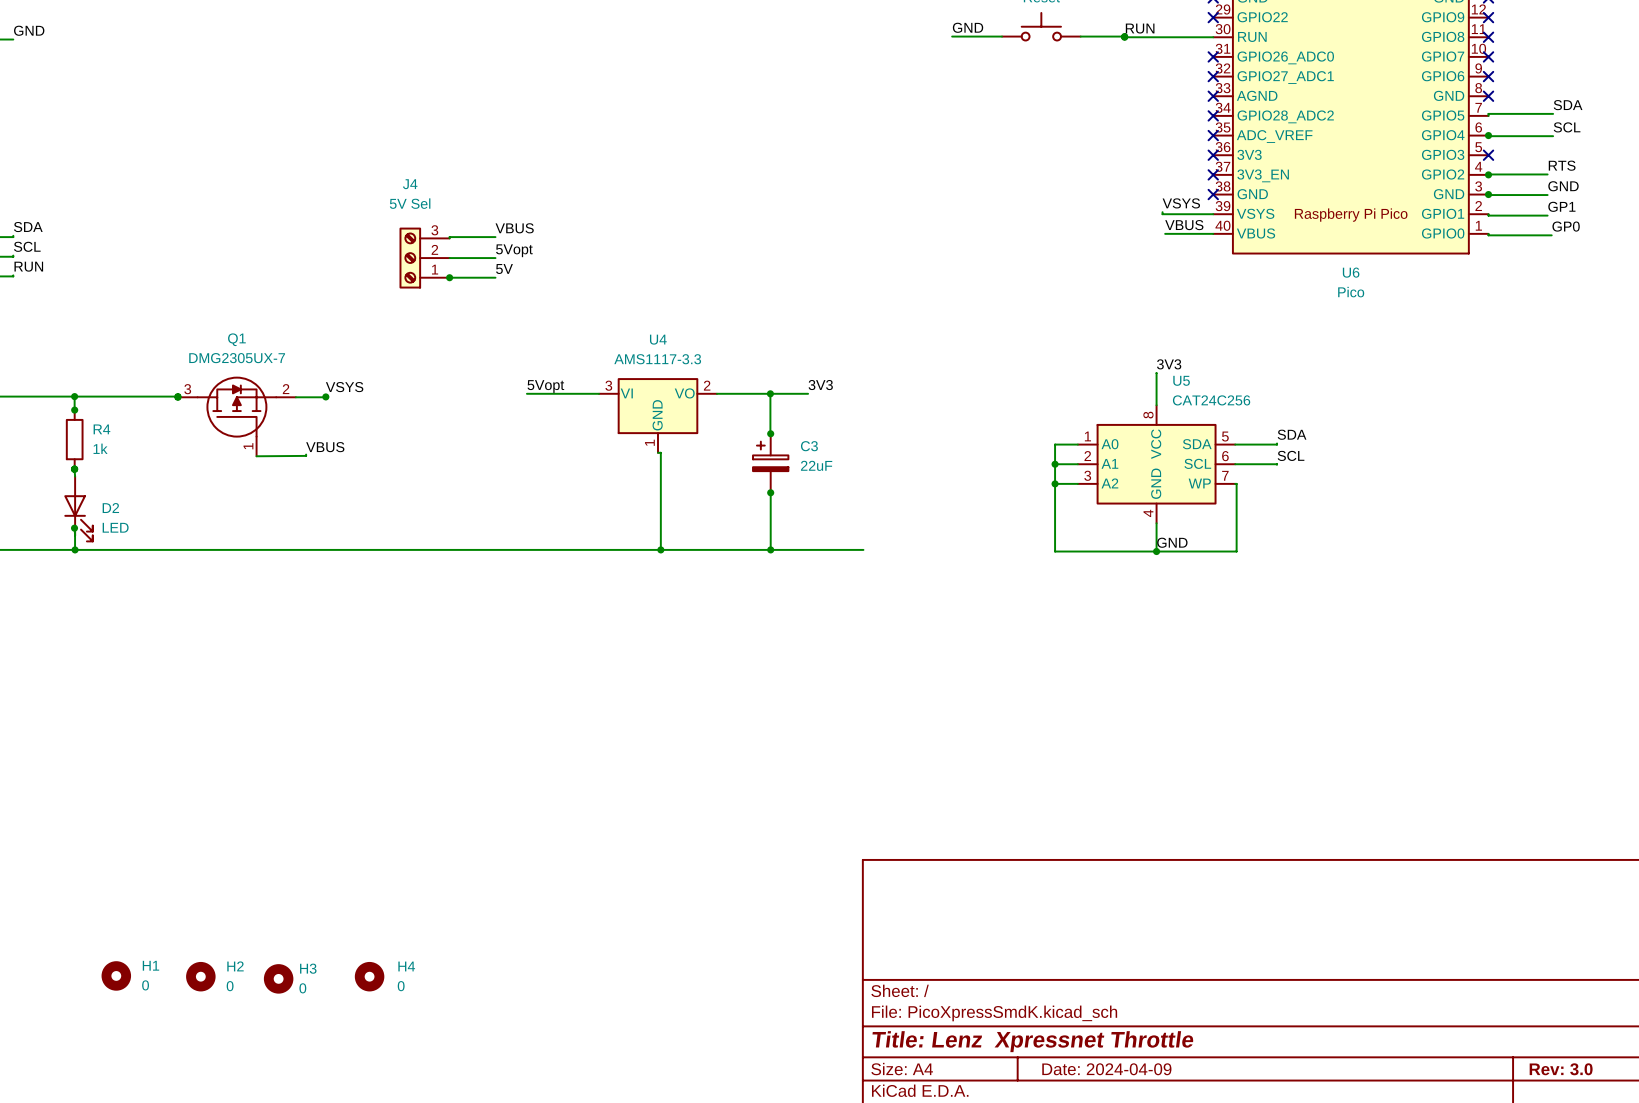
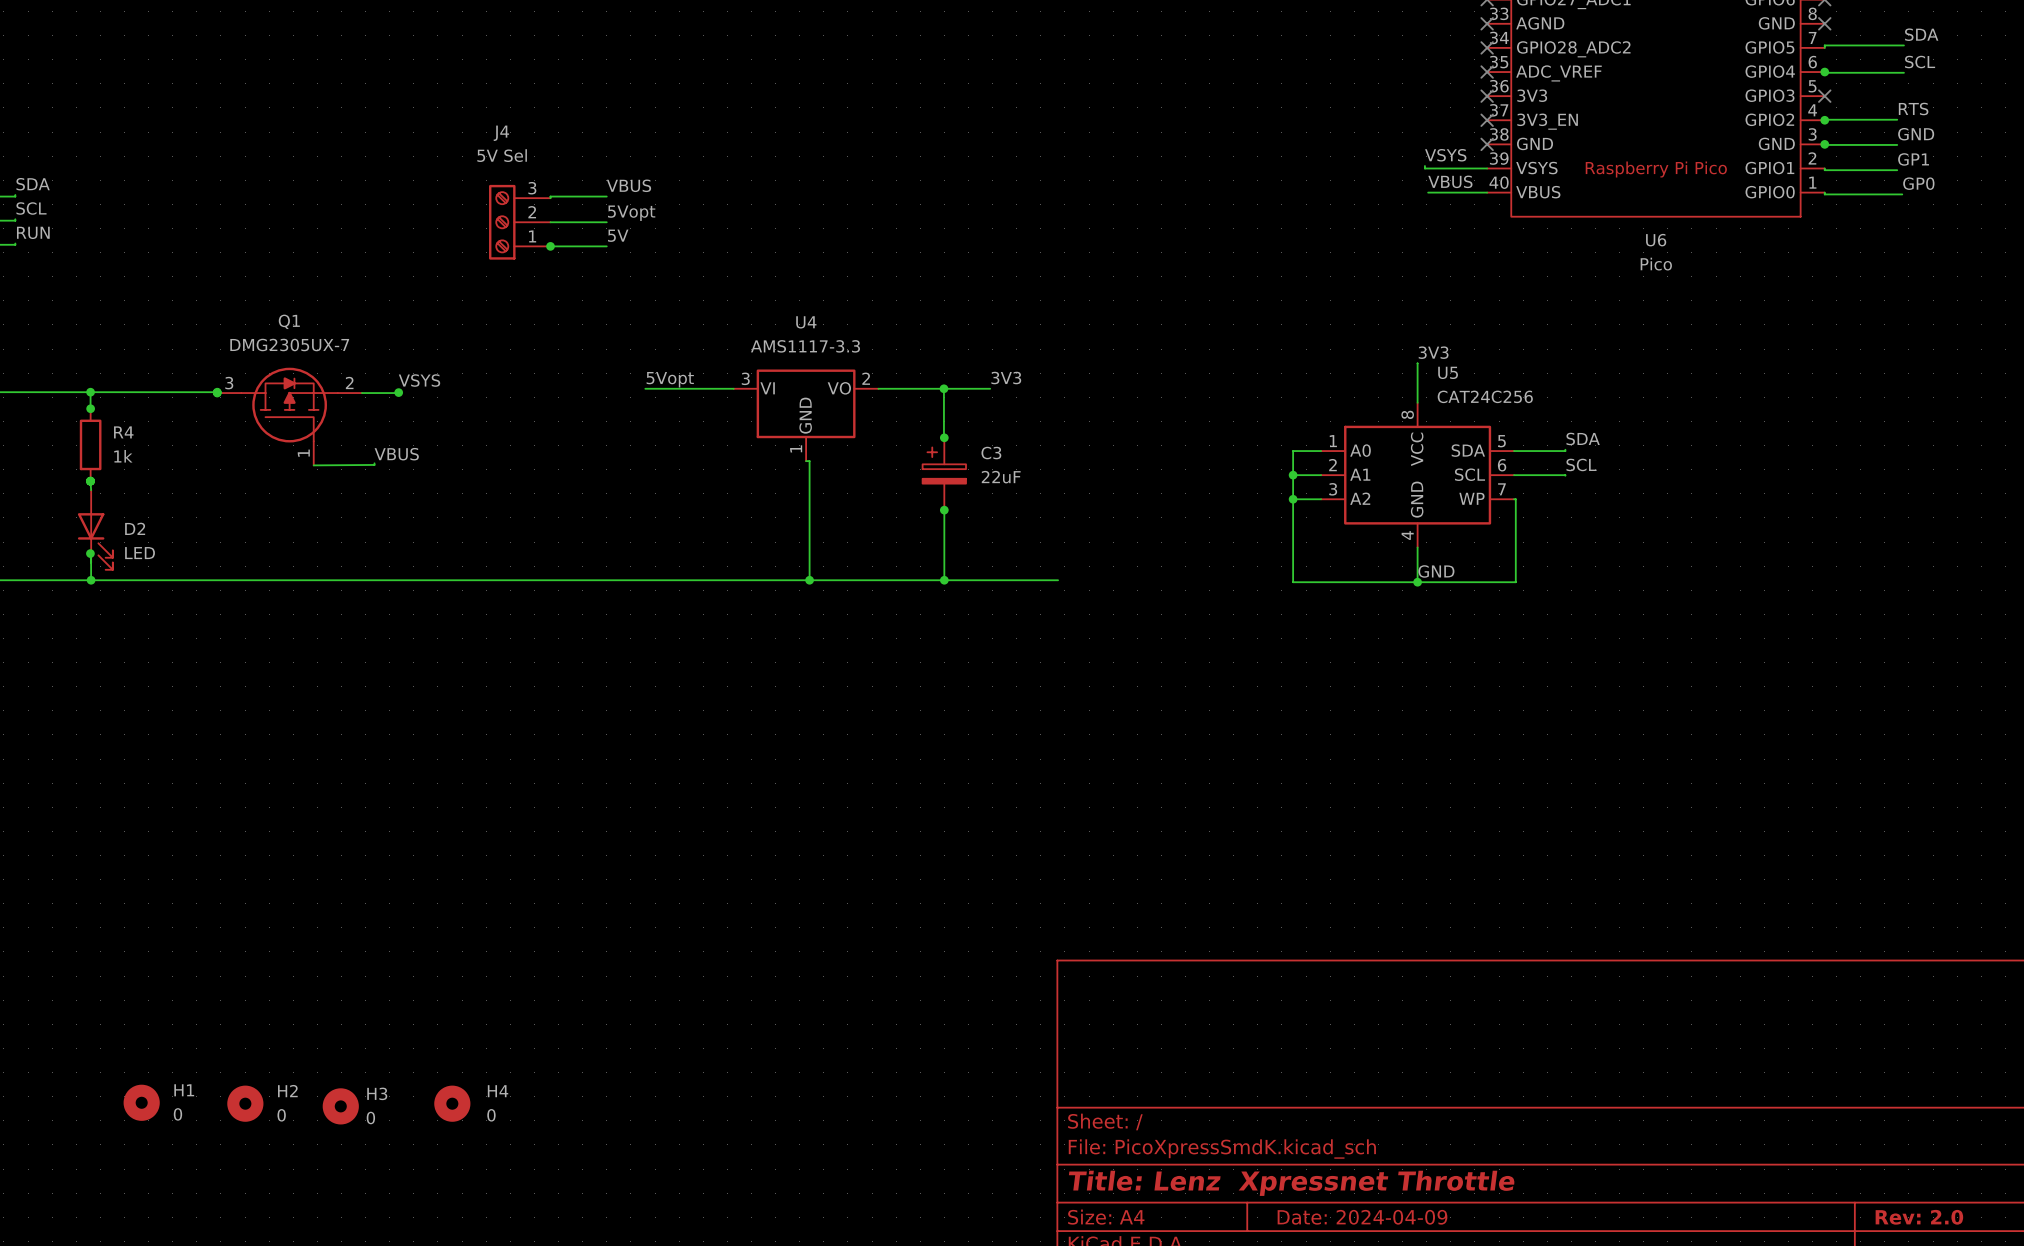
title block: Rev: 3.0 (1561, 1069) -> Rev: 2.0 (1919, 1217)

